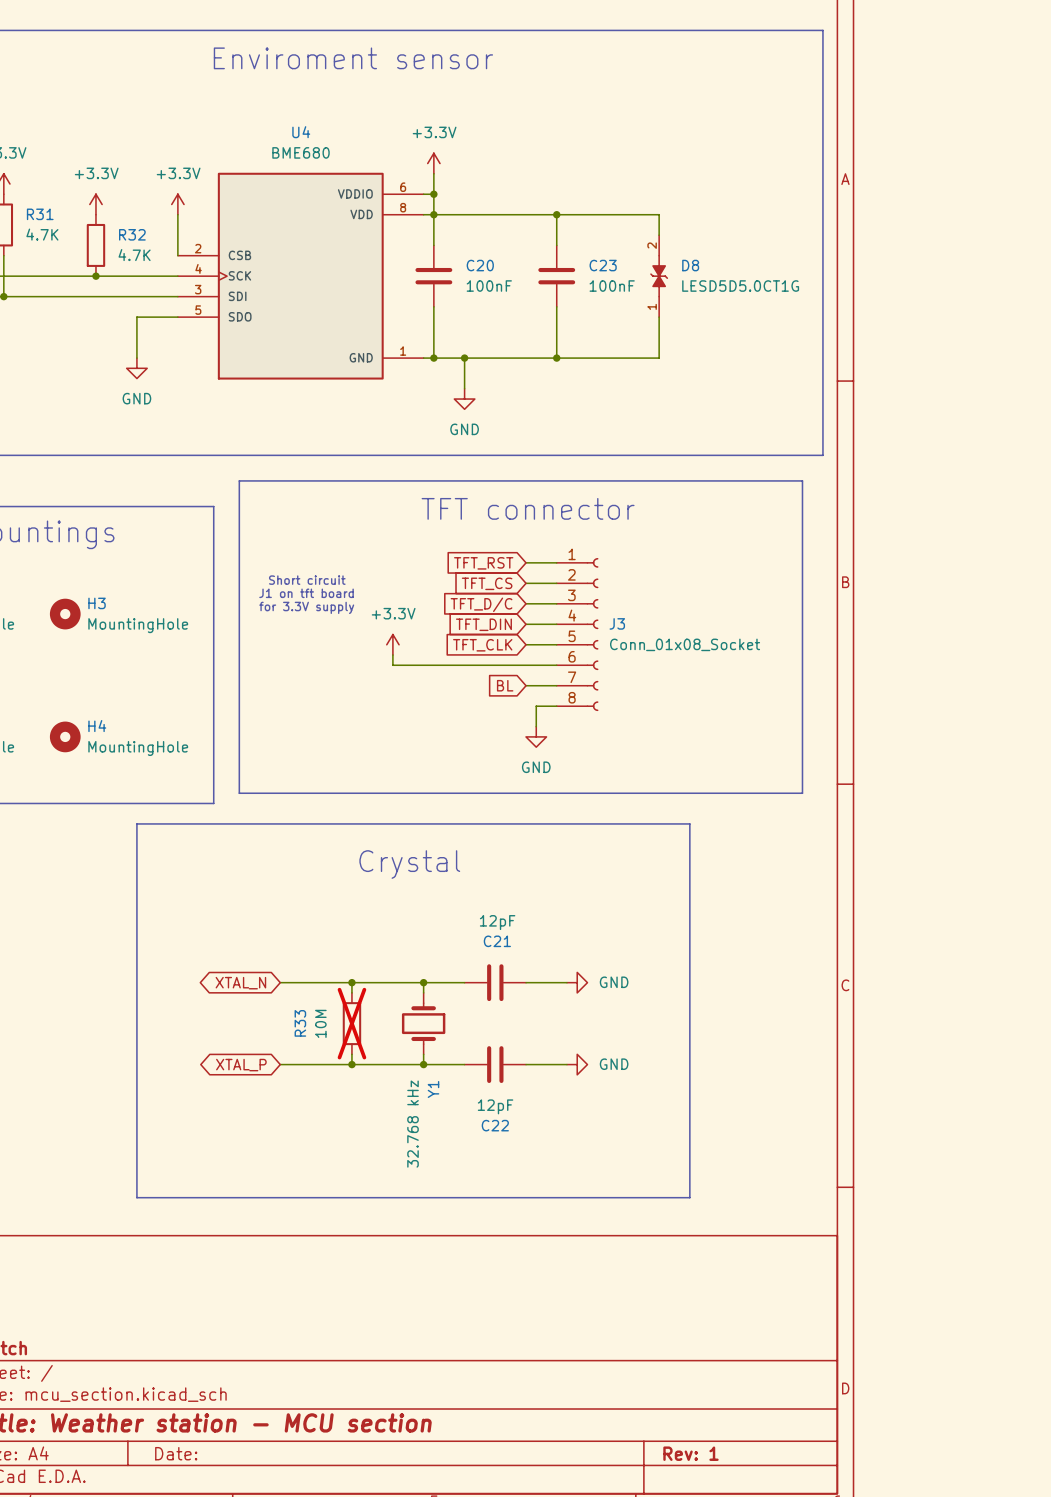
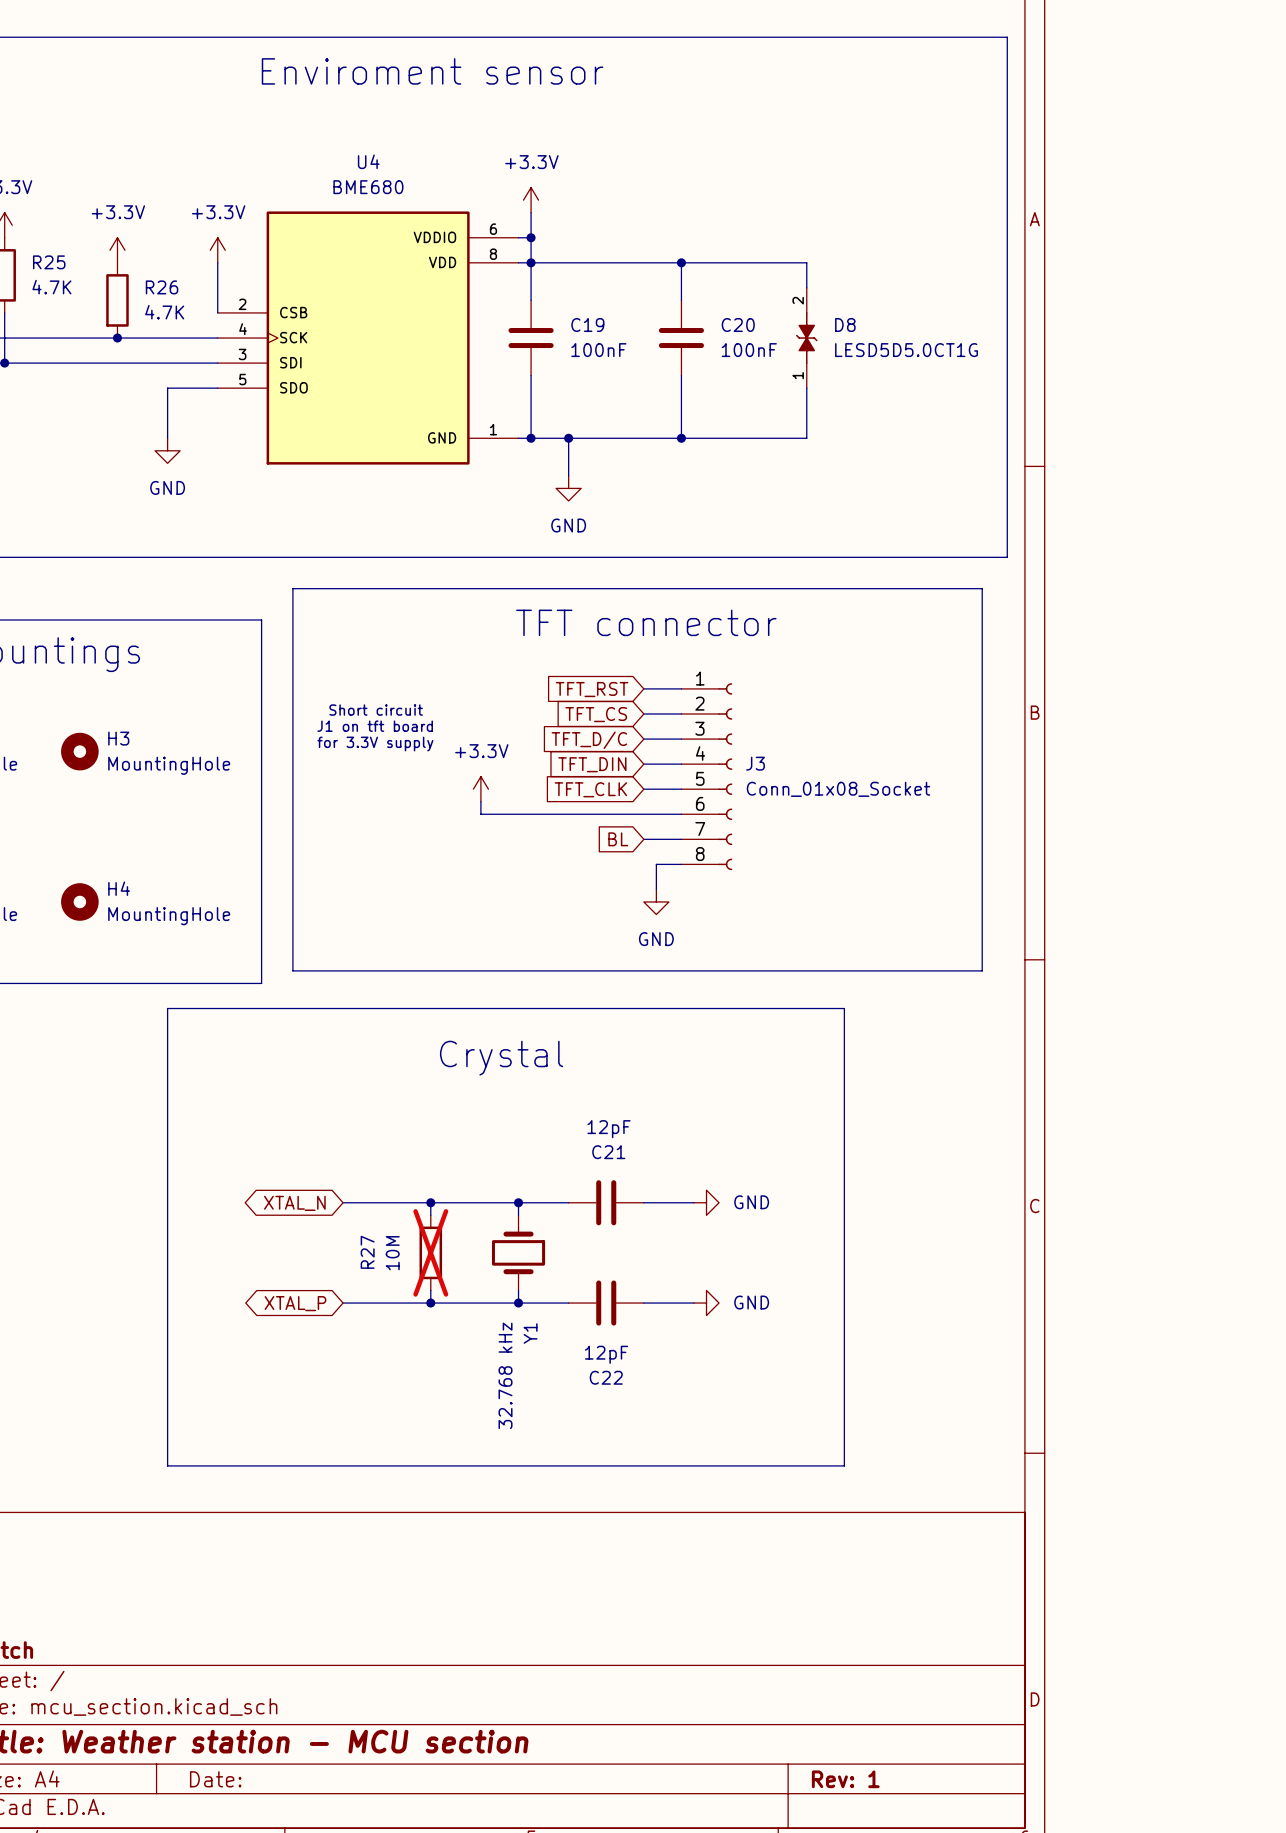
R31 name: R31 (40, 214) -> R25 (49, 262)
R32 name: R32 (132, 234) -> R26 (162, 287)
C20 name: C20 (480, 265) -> C19 (587, 325)
C23 name: C23 (603, 265) -> C20 (738, 325)
R33 name: R33 (300, 1023) -> R27 (367, 1252)

